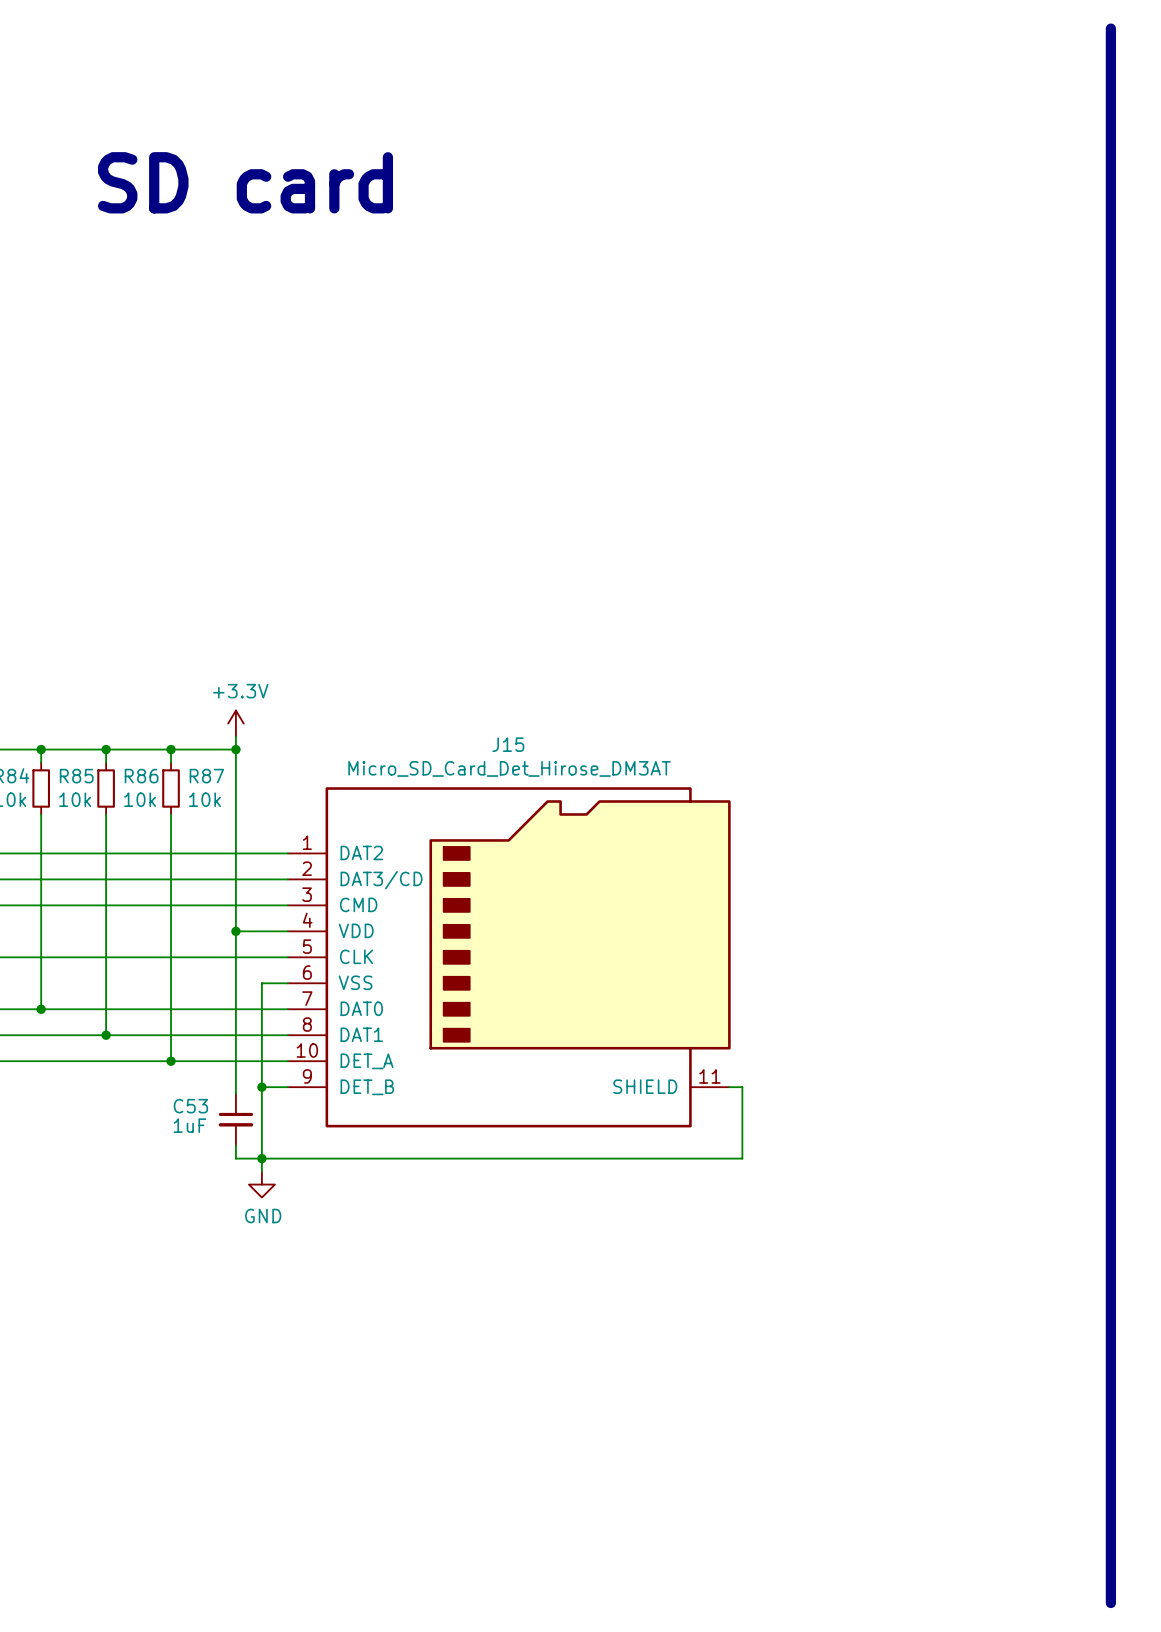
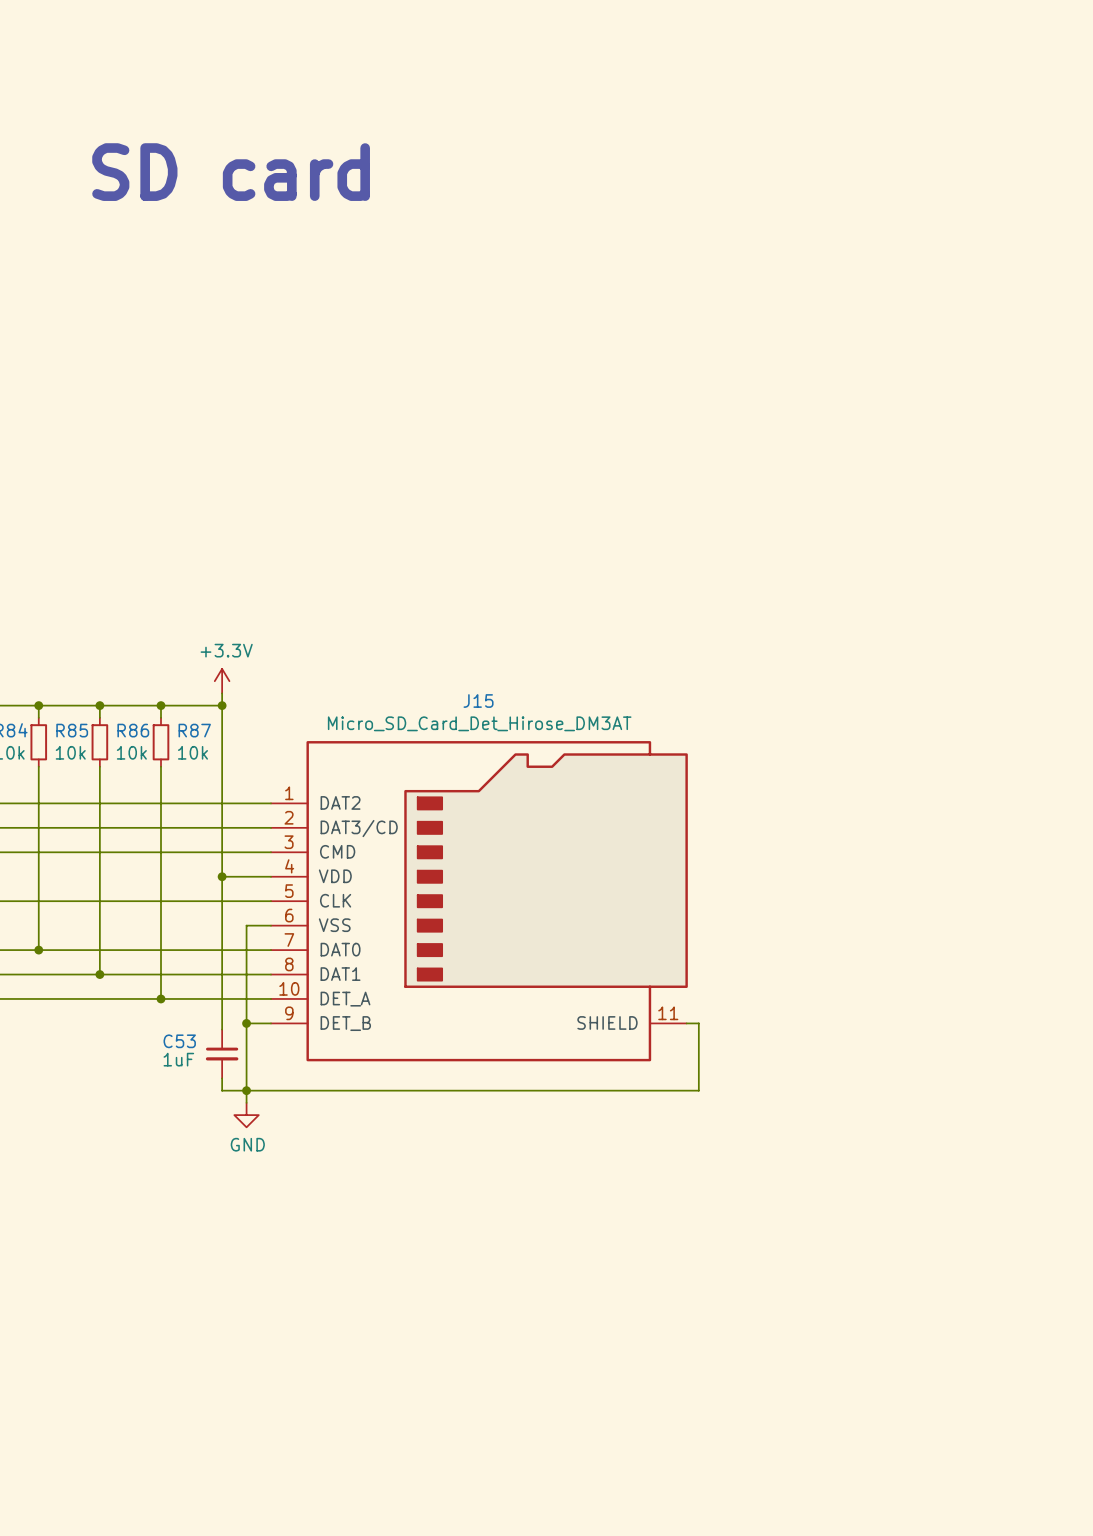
line: (1110, 28) (1110, 1603) -> none

